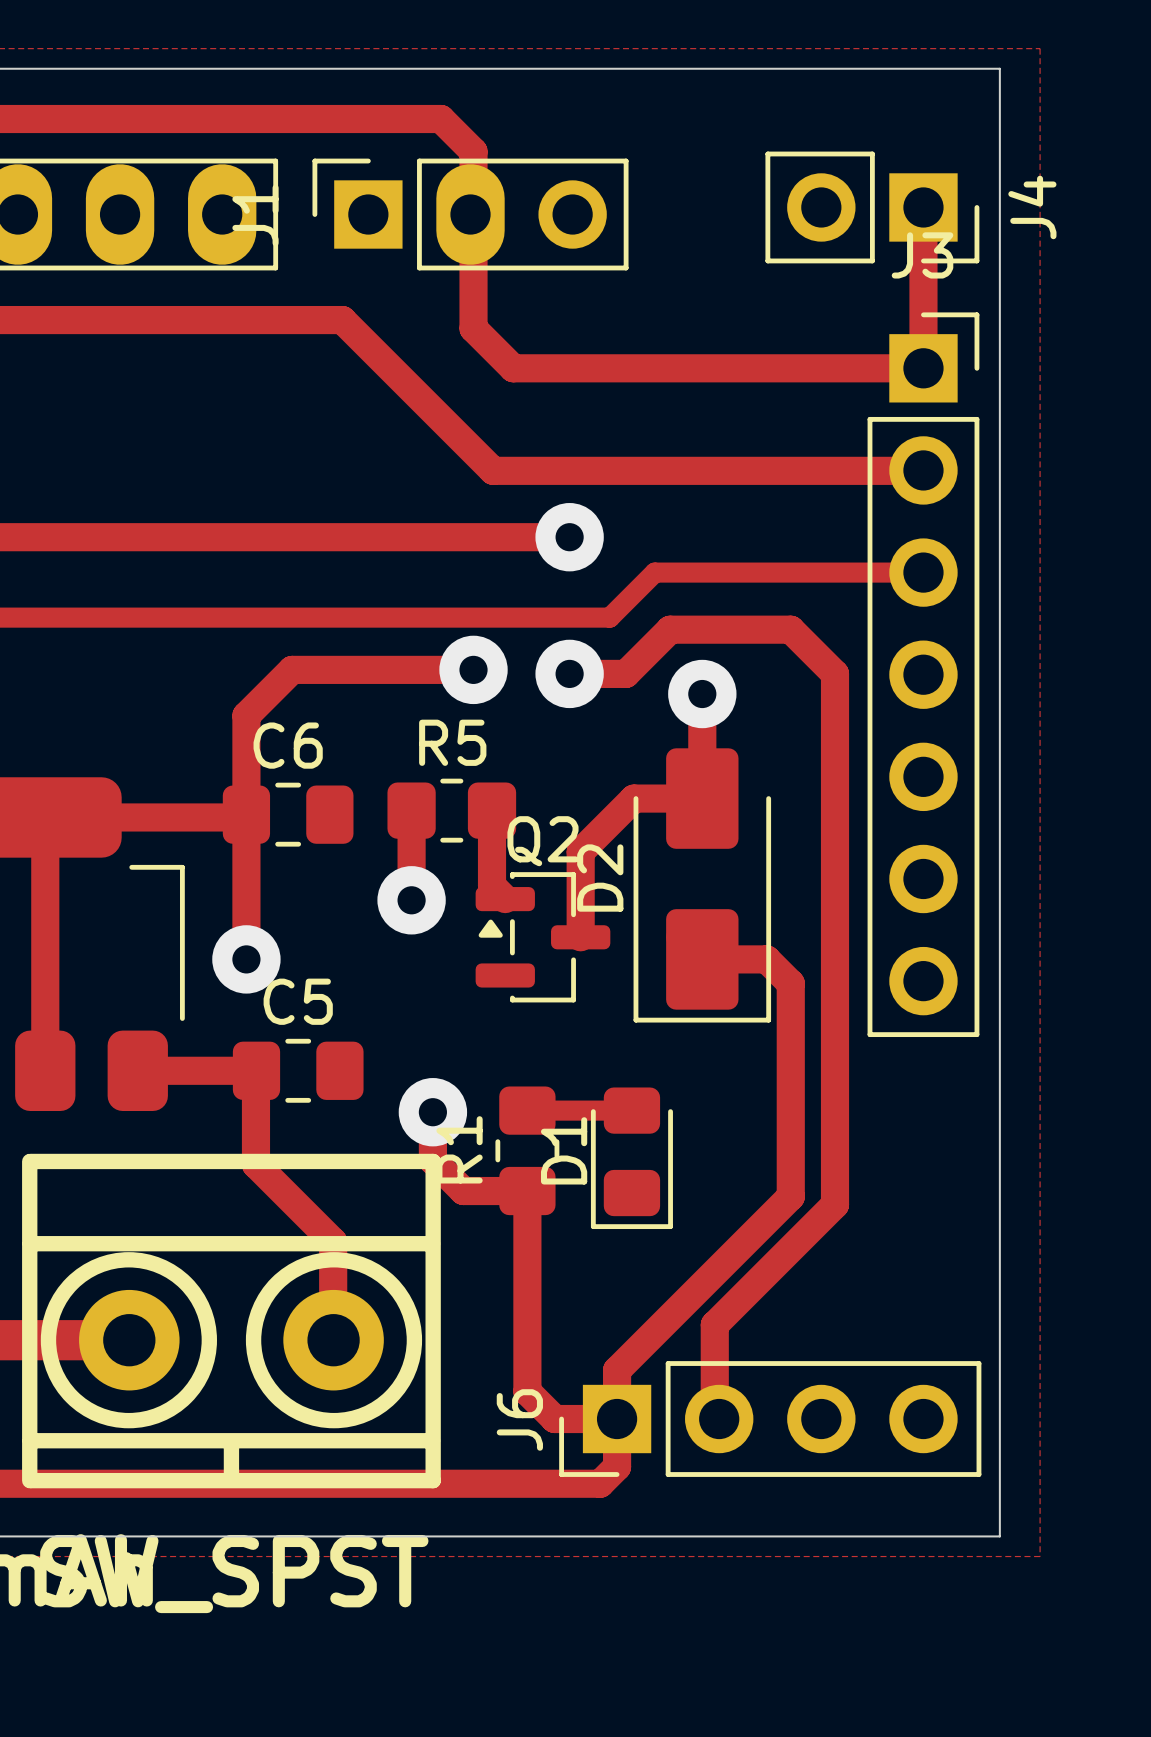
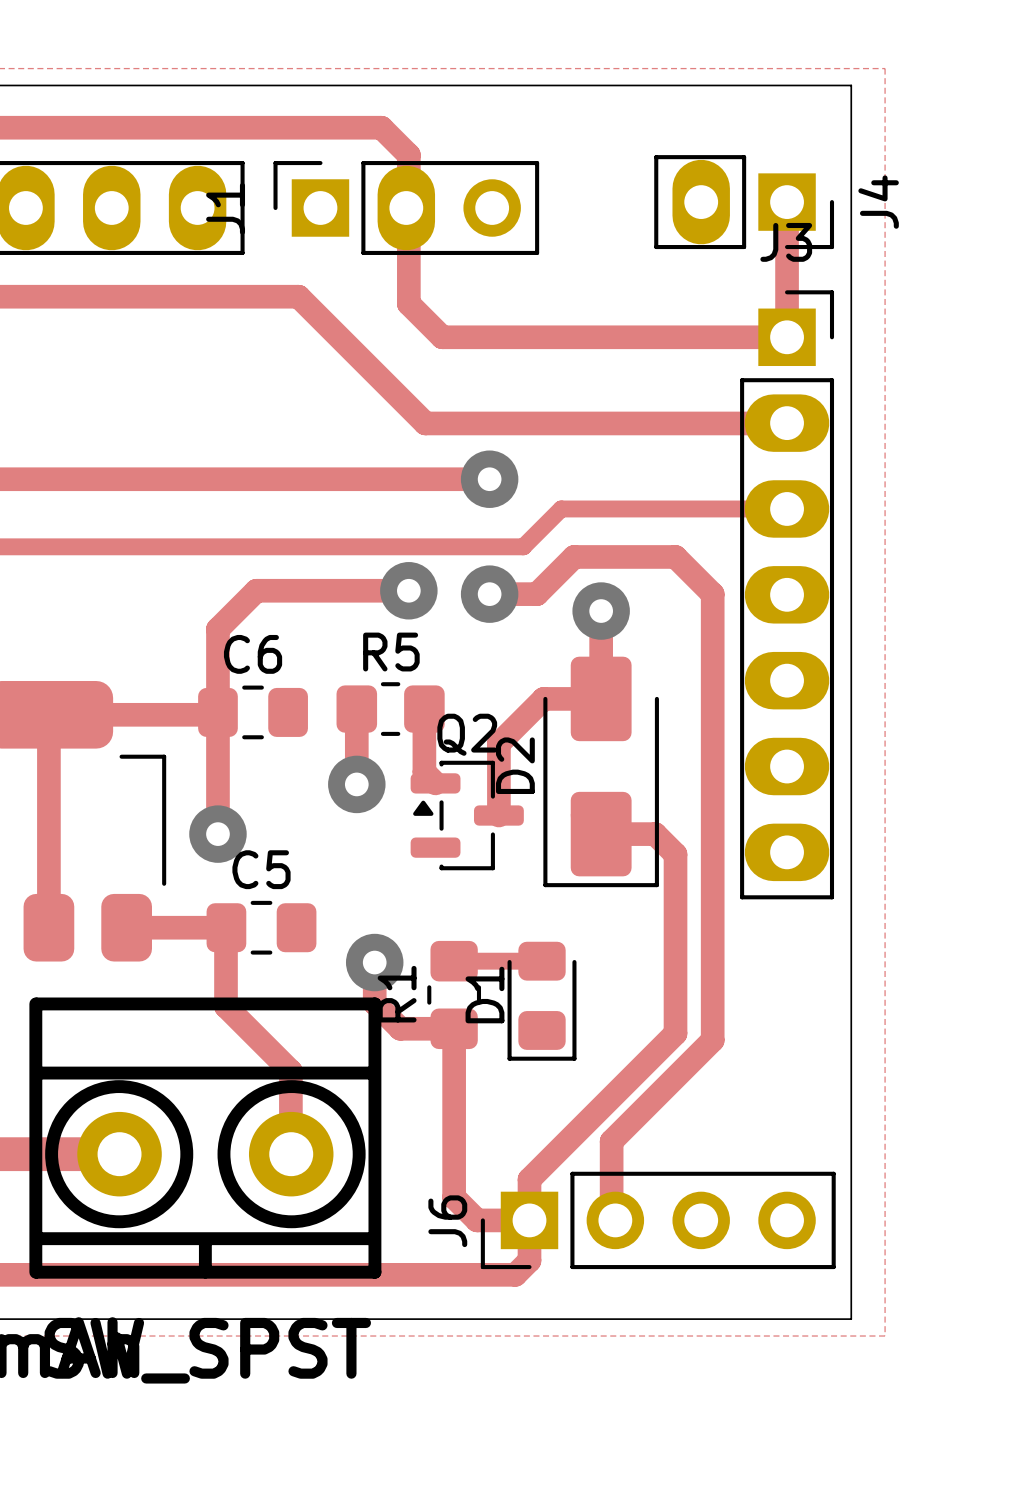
J4 footprint: [765, 151, 980, 264] -> [654, 155, 835, 250]
J3 footprint: [867, 312, 980, 1038] -> [740, 290, 835, 900]

